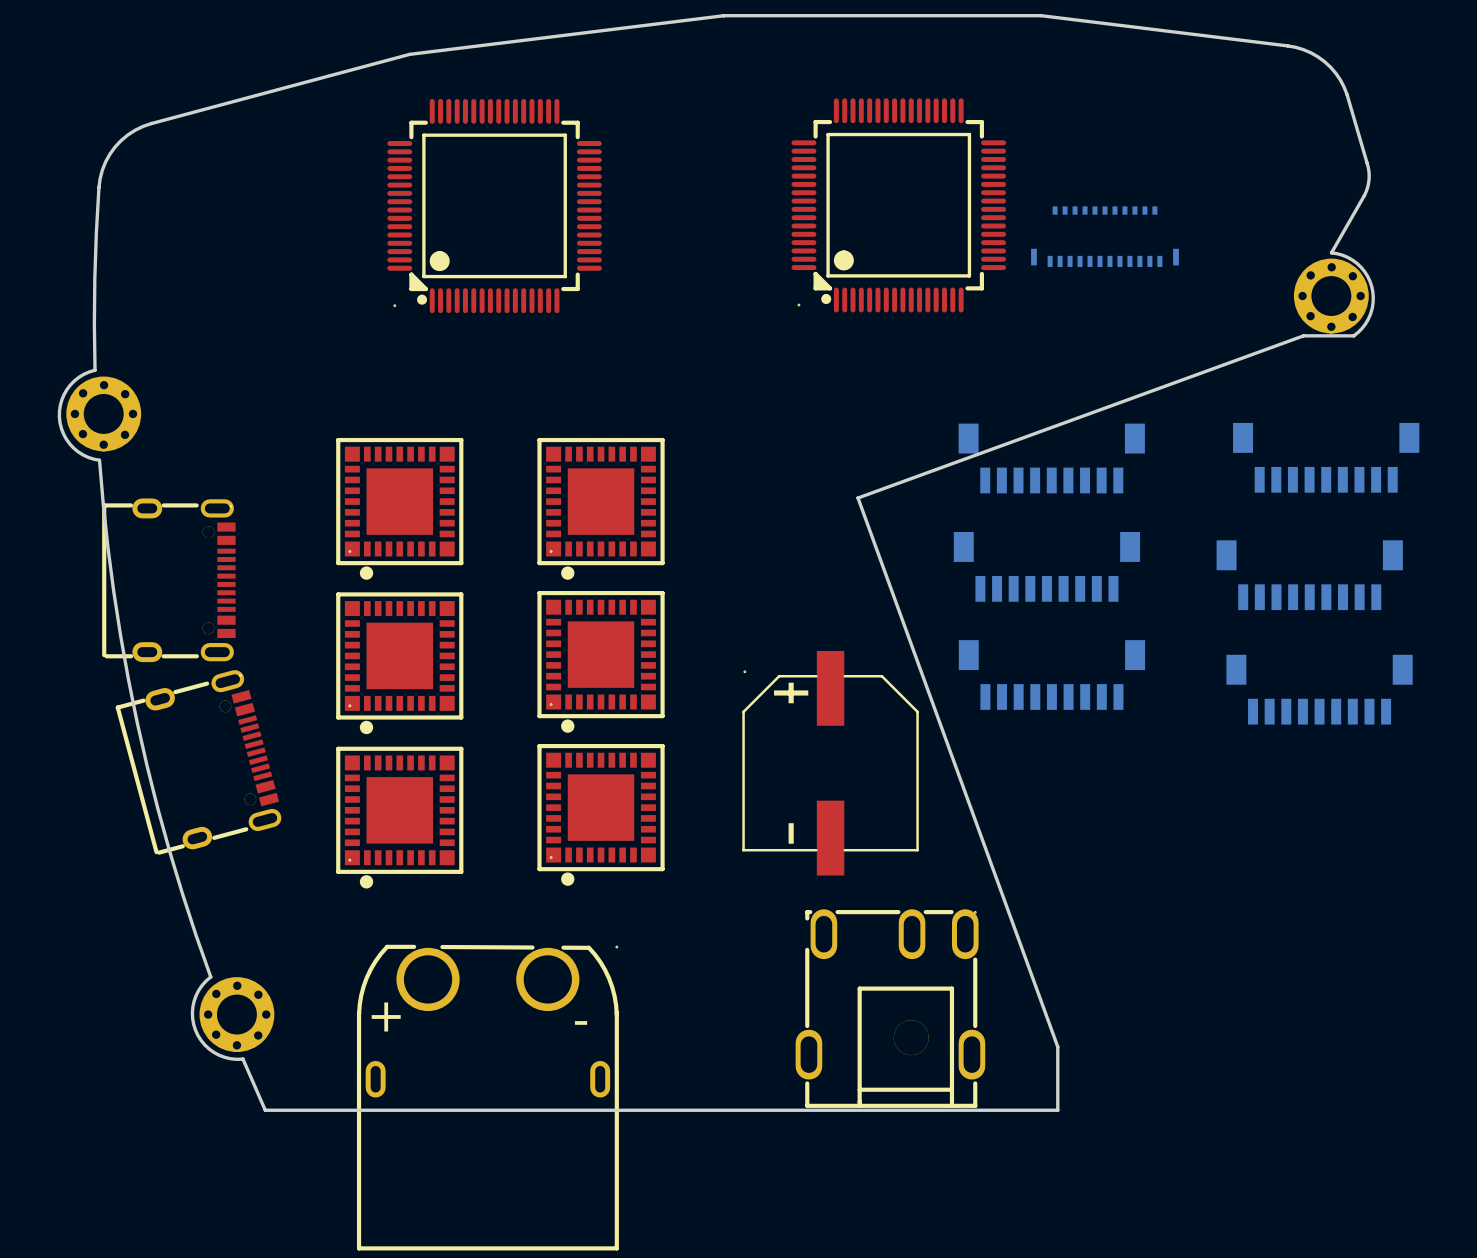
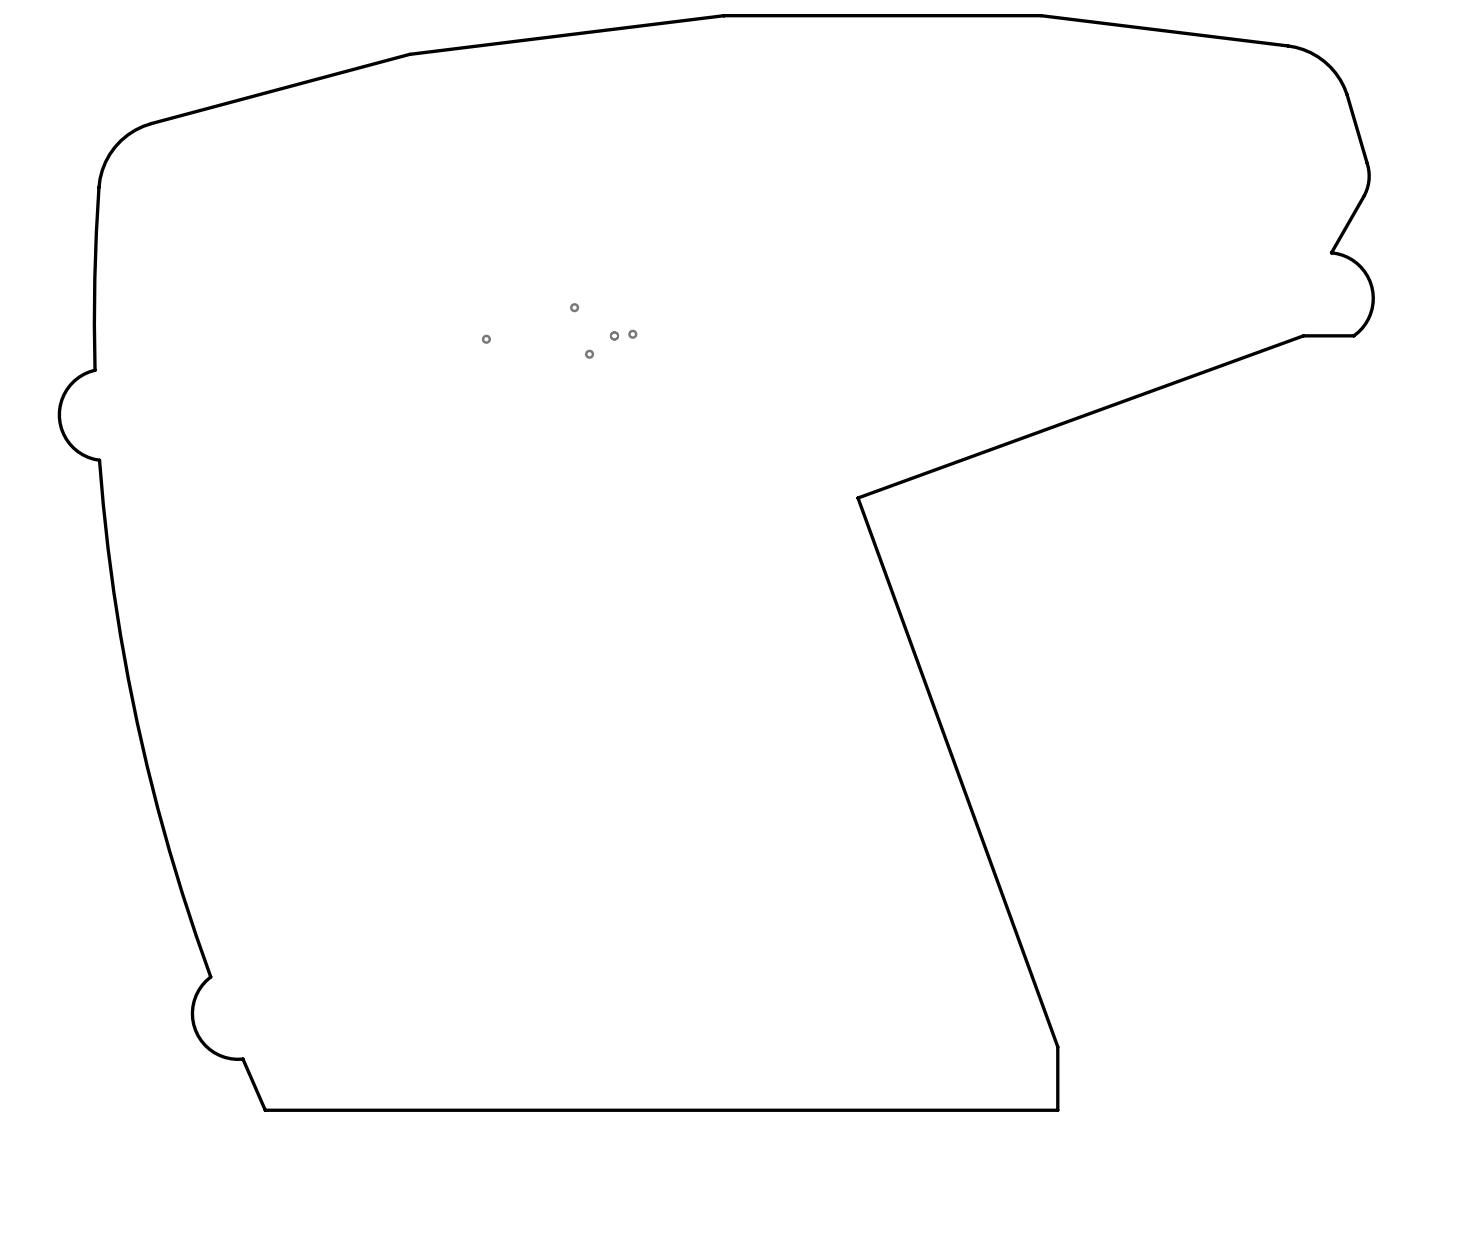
part: (898, 205) -> none
part: (494, 206) -> none
part: (1104, 236) -> none
part: (1331, 296) -> none
via: none -> (574, 307)
via: none -> (632, 334)
via: none -> (614, 335)
via: none -> (486, 339)
via: none -> (589, 354)
part: (103, 413) -> none
part: (1326, 457) -> none
part: (1051, 458) -> none
part: (399, 508) -> none
part: (601, 508) -> none
part: (1046, 566) -> none
part: (1309, 575) -> none
part: (168, 580) -> none
part: (601, 661) -> none
part: (399, 663) -> none
part: (1051, 674) -> none
part: (1319, 689) -> none
part: (198, 762) -> none
part: (830, 763) -> none
part: (601, 814) -> none
part: (399, 817) -> none
part: (890, 1008) -> none
part: (236, 1014) -> none
part: (487, 1097) -> none

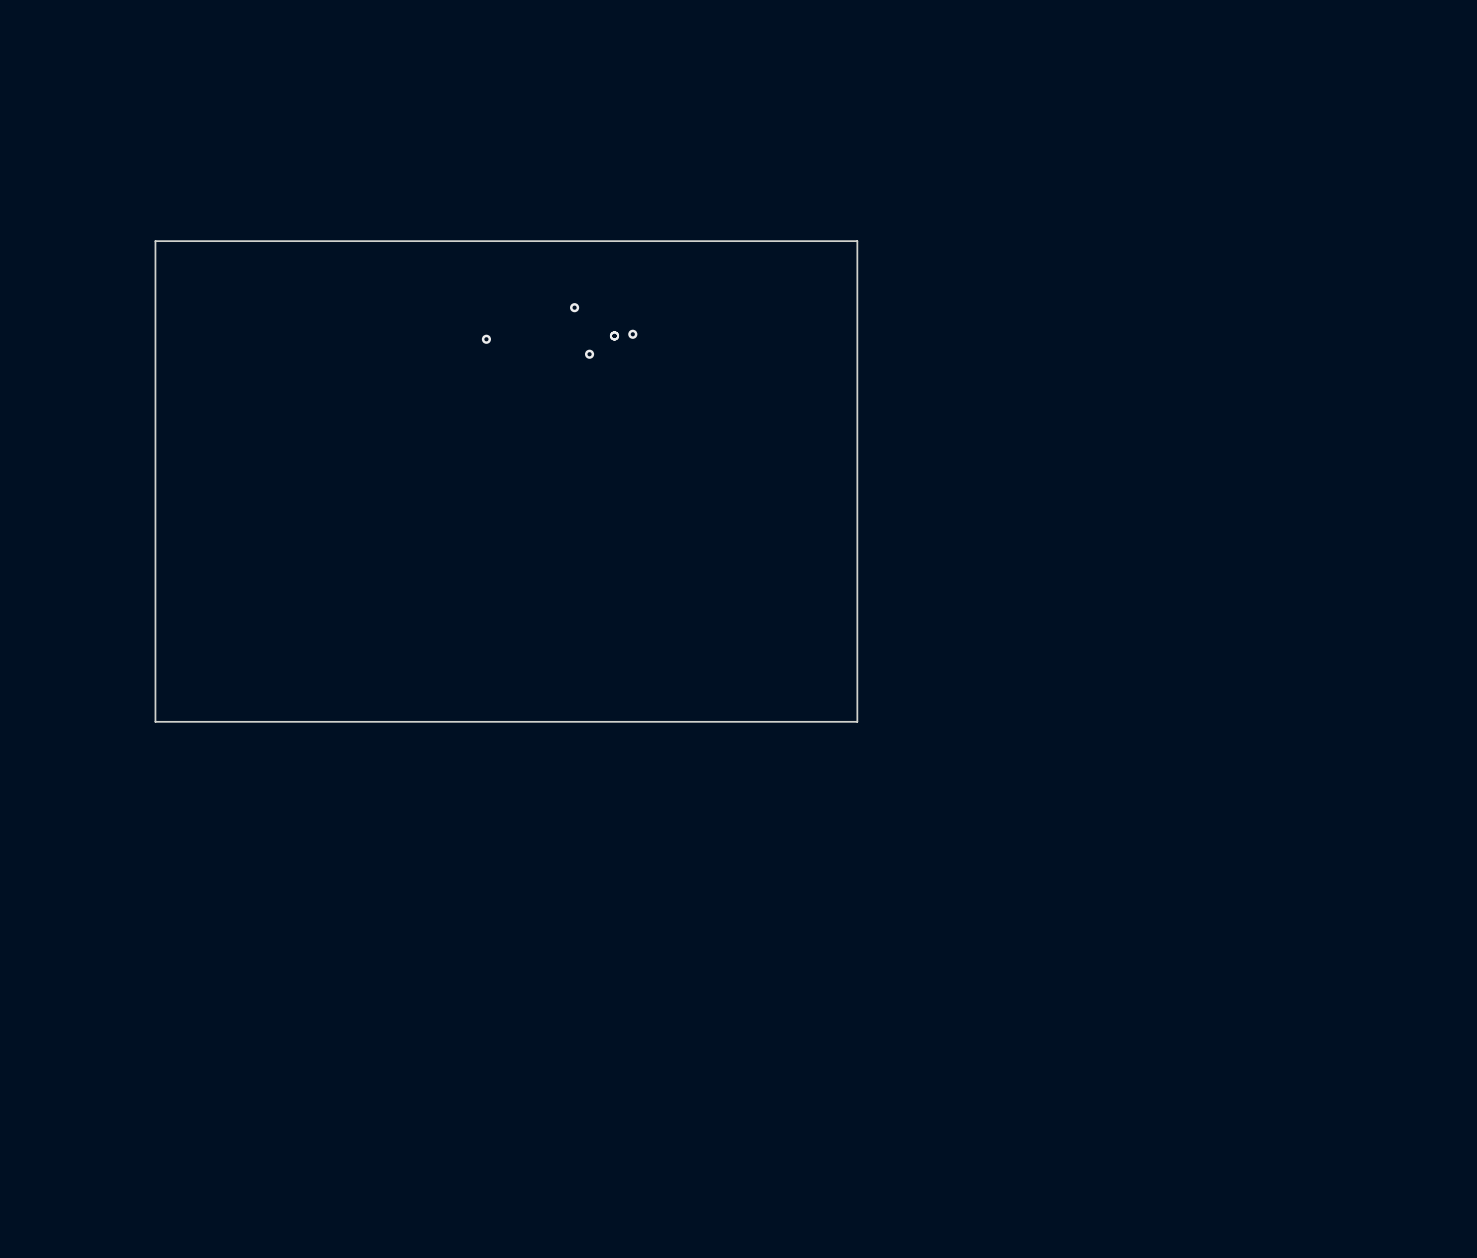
board edge: (724, 15) (1041, 15) (1287, 45) (1303, 49) (1324, 61) (1340, 79) (1347, 94) (1368, 167) (1369, 179) (1364, 195) (1331, 252) (1347, 257) (1356, 263) (1364, 271) (1371, 286) (1373, 303) (1370, 314) (1358, 332) (1353, 335) (1303, 335) (858, 498) (1057, 1046) (1057, 1110) (265, 1110) (242, 1059) (225, 1057) (209, 1049) (198, 1035) (193, 1024) (192, 1006) (196, 995) (202, 985) (210, 976) (169, 851) (137, 722) (113, 592) (99, 460) (88, 457) (73, 448) (66, 439) (60, 422) (60, 405) (66, 389) (79, 377) (95, 370) (96, 233) (98, 187) (105, 161) (121, 140) (143, 126) (409, 54) (724, 15) -> none
board edge: none -> (155, 241) (857, 241) (857, 721) (155, 721) (155, 241)

